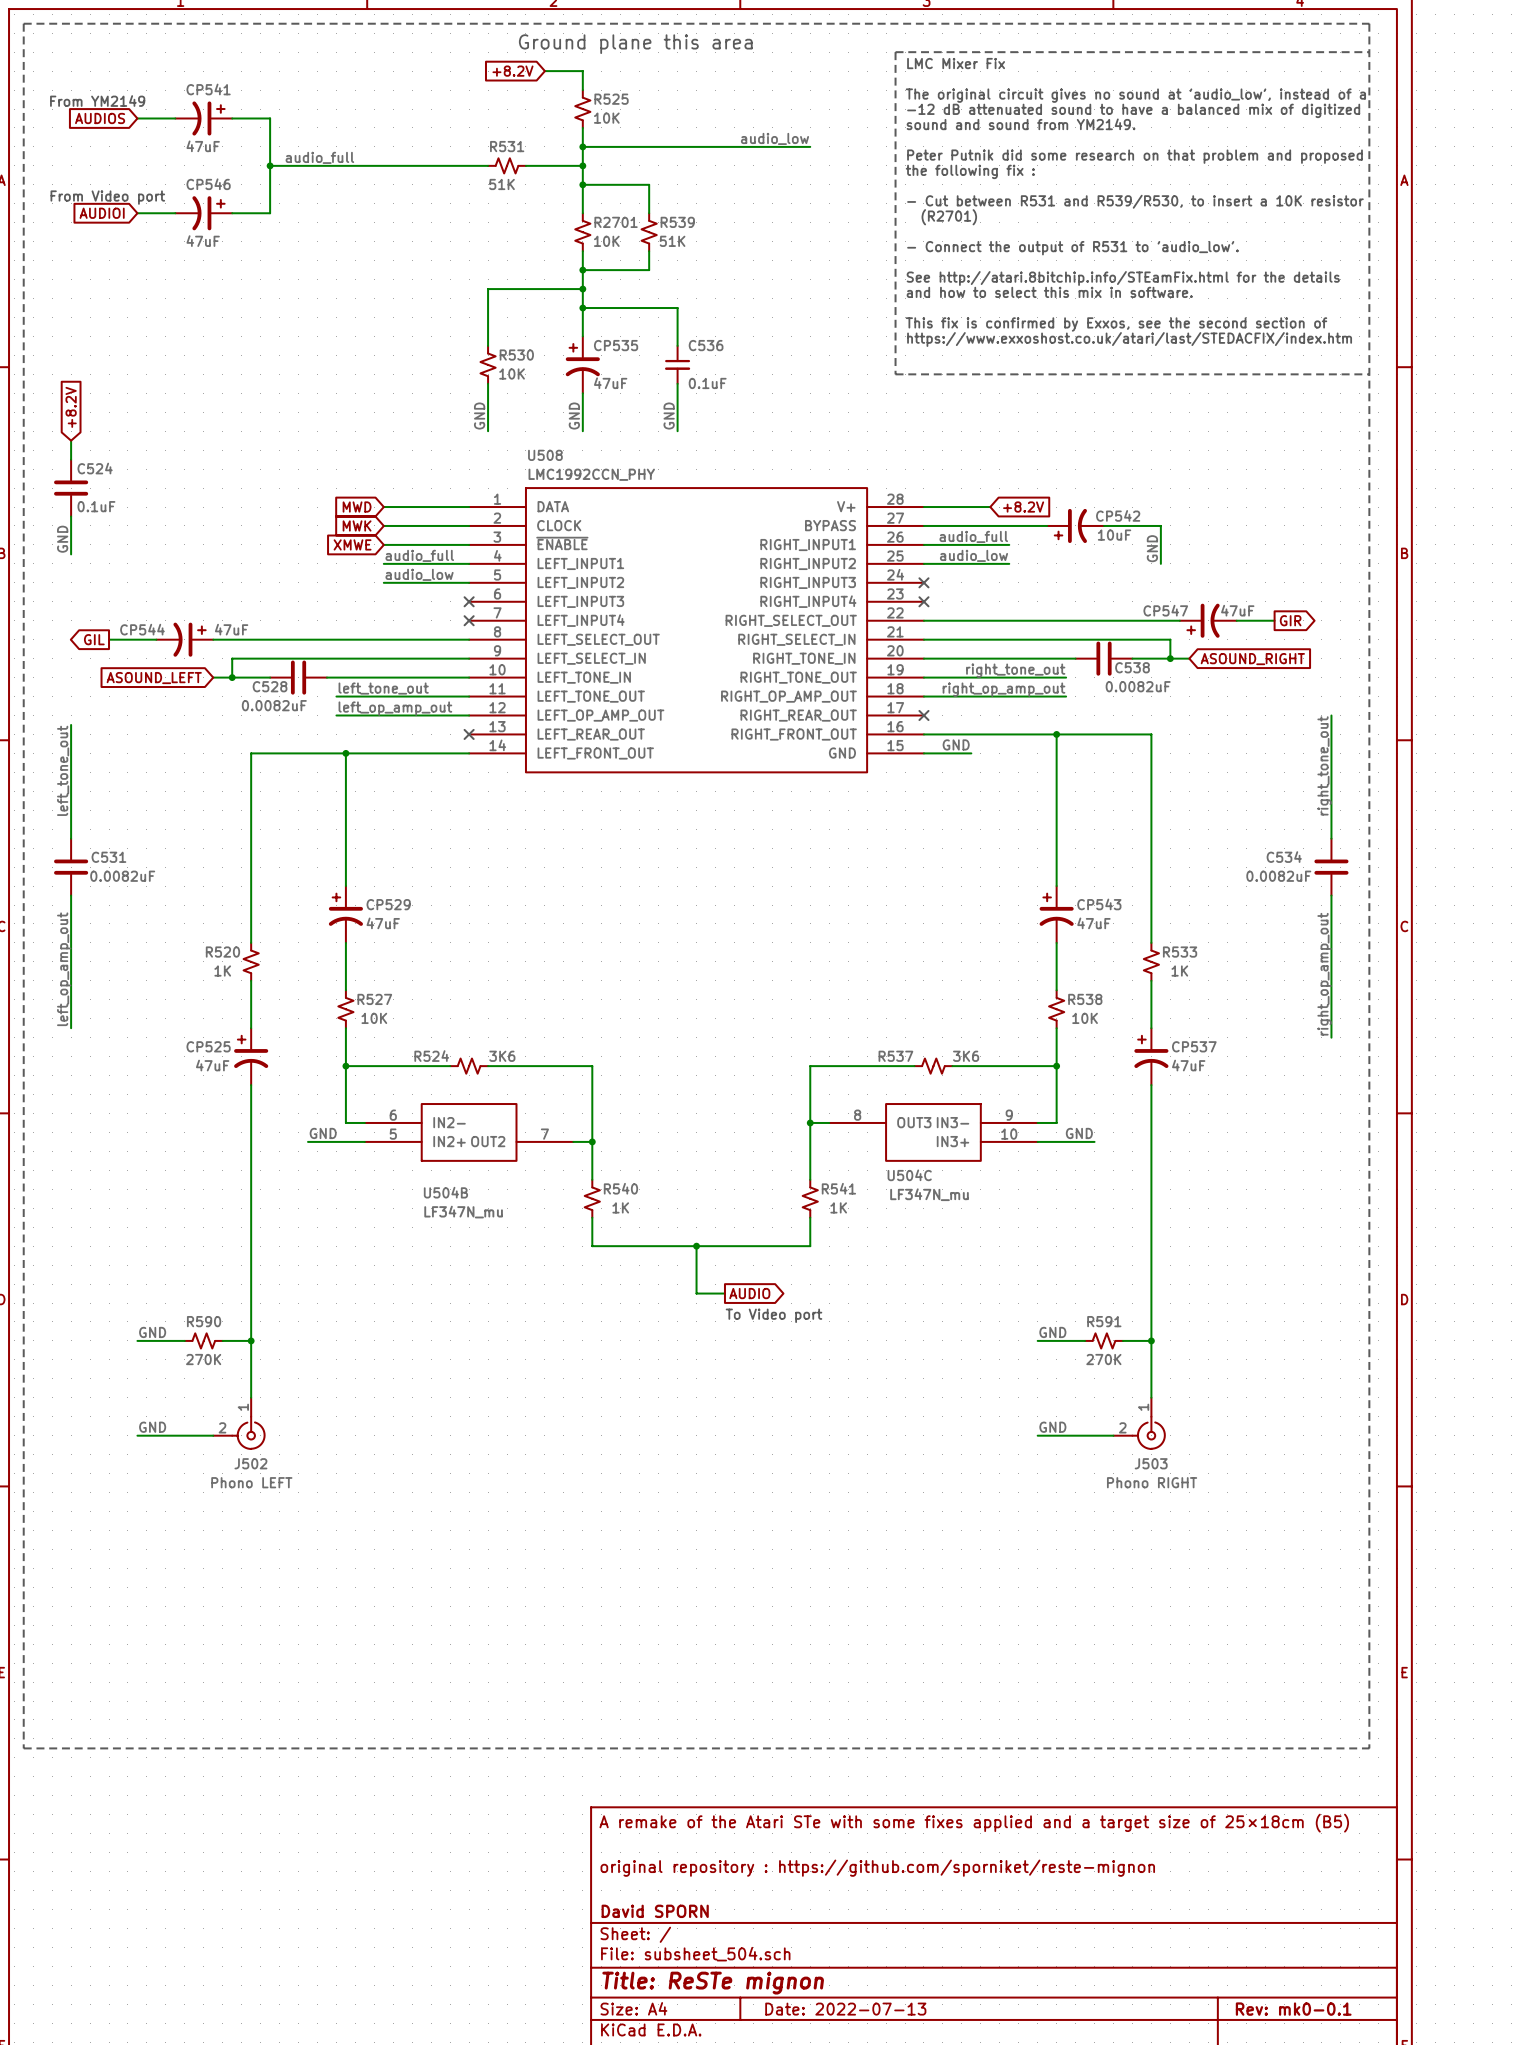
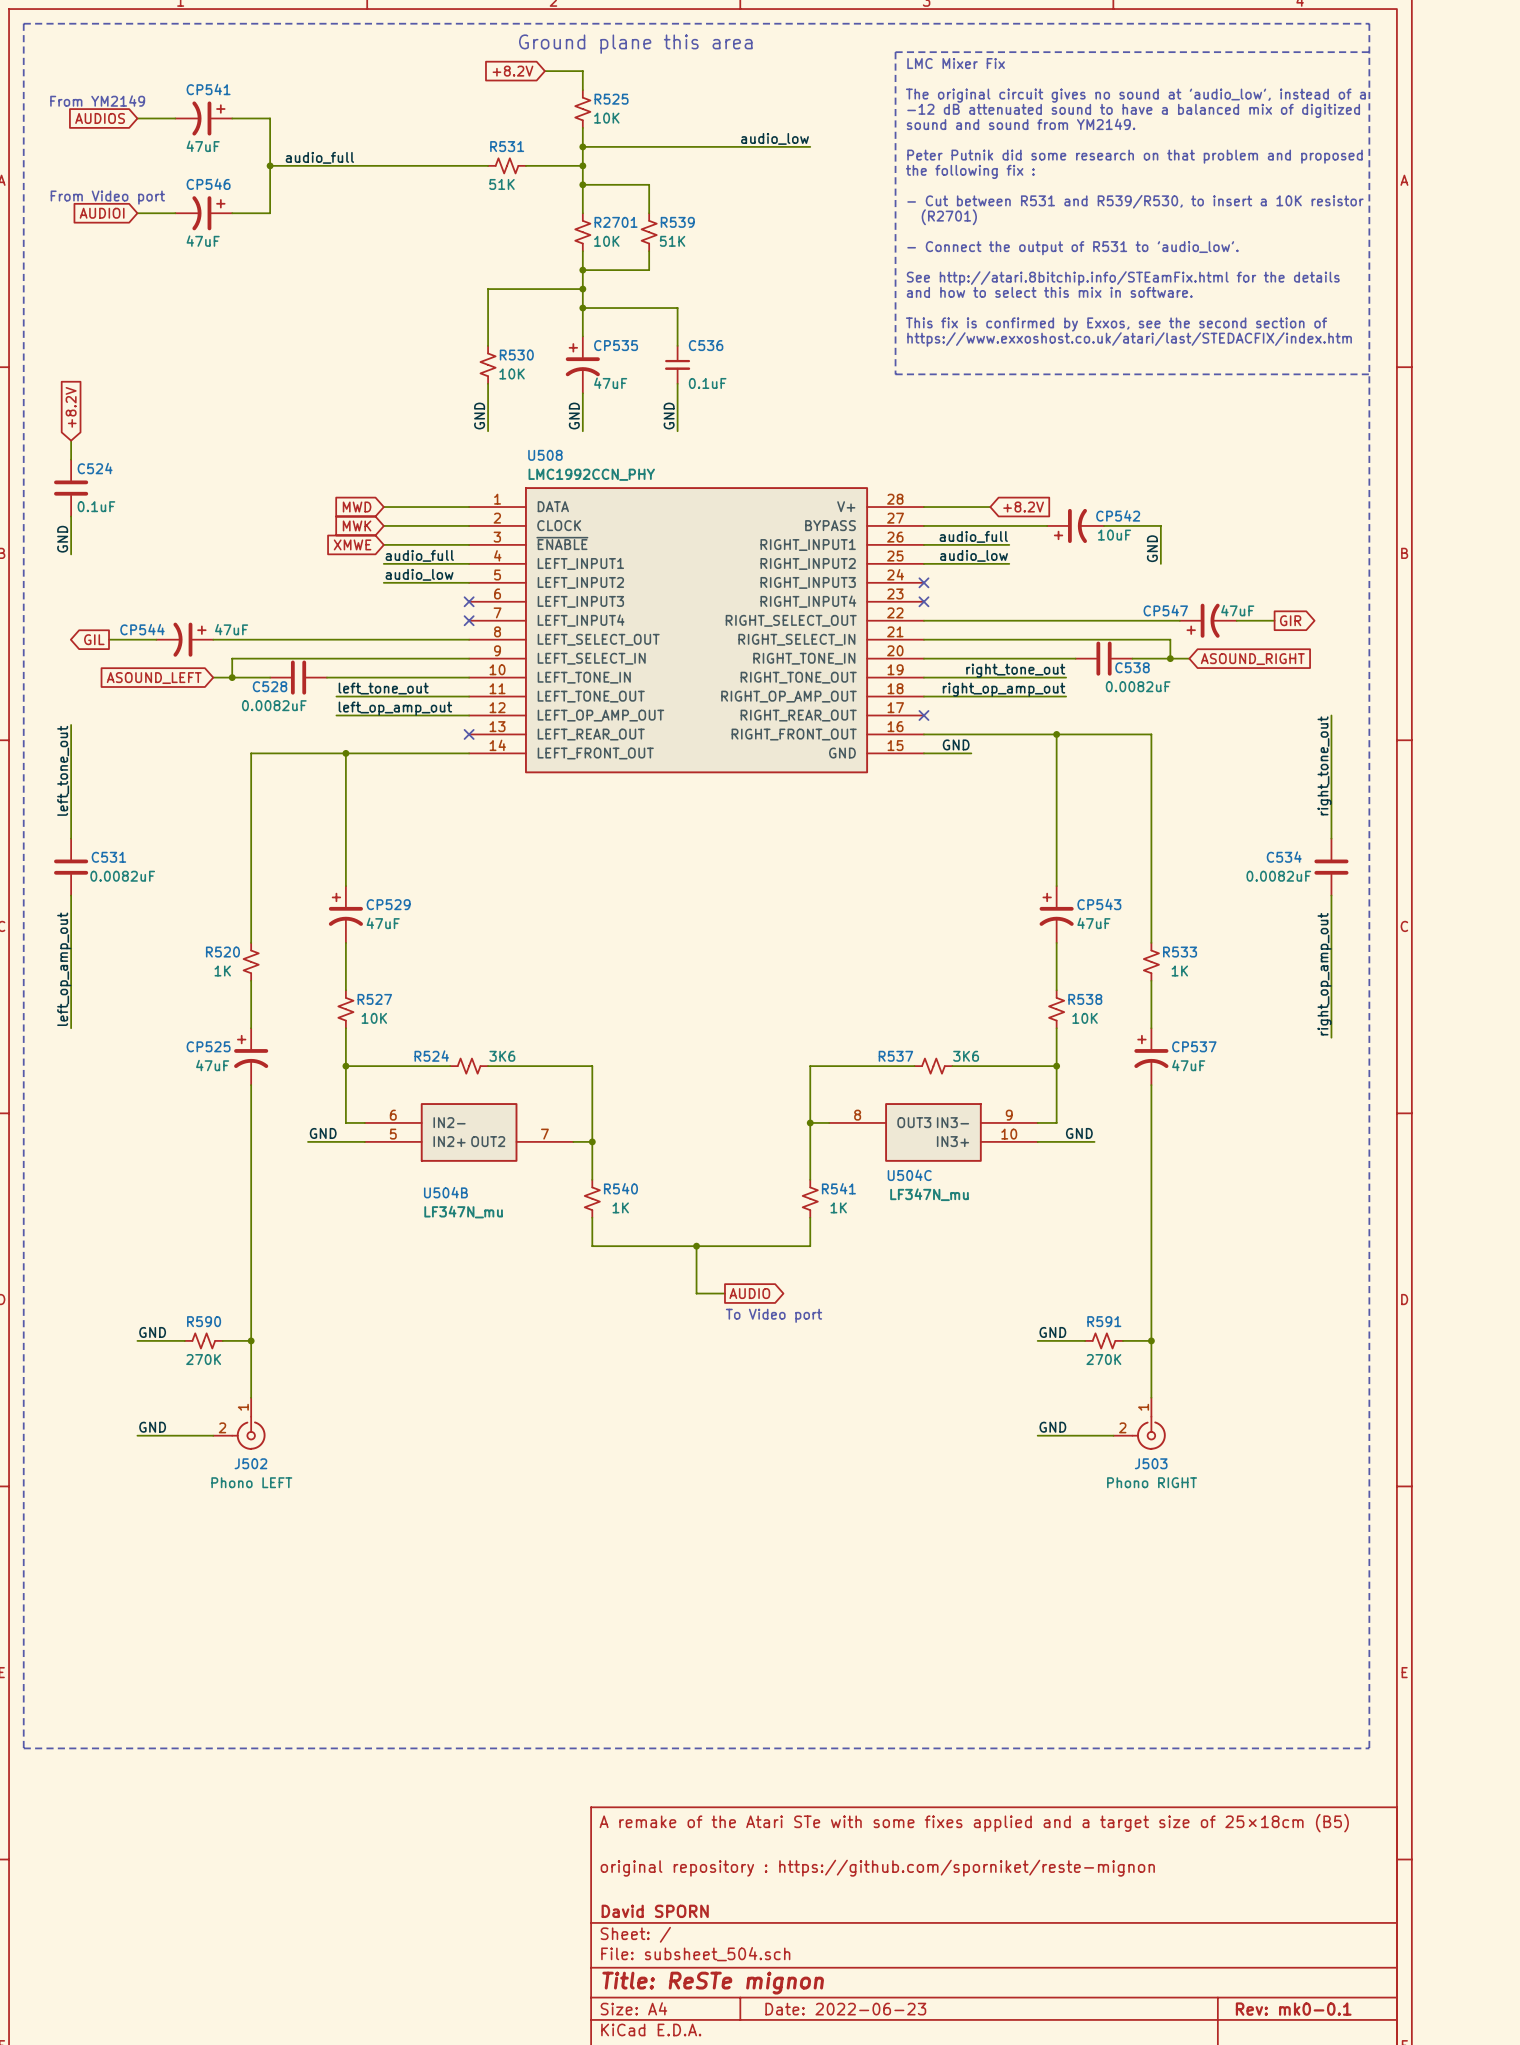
title block: Date: 2022-07-13 (845, 2009) -> Date: 2022-06-23 (845, 2009)

